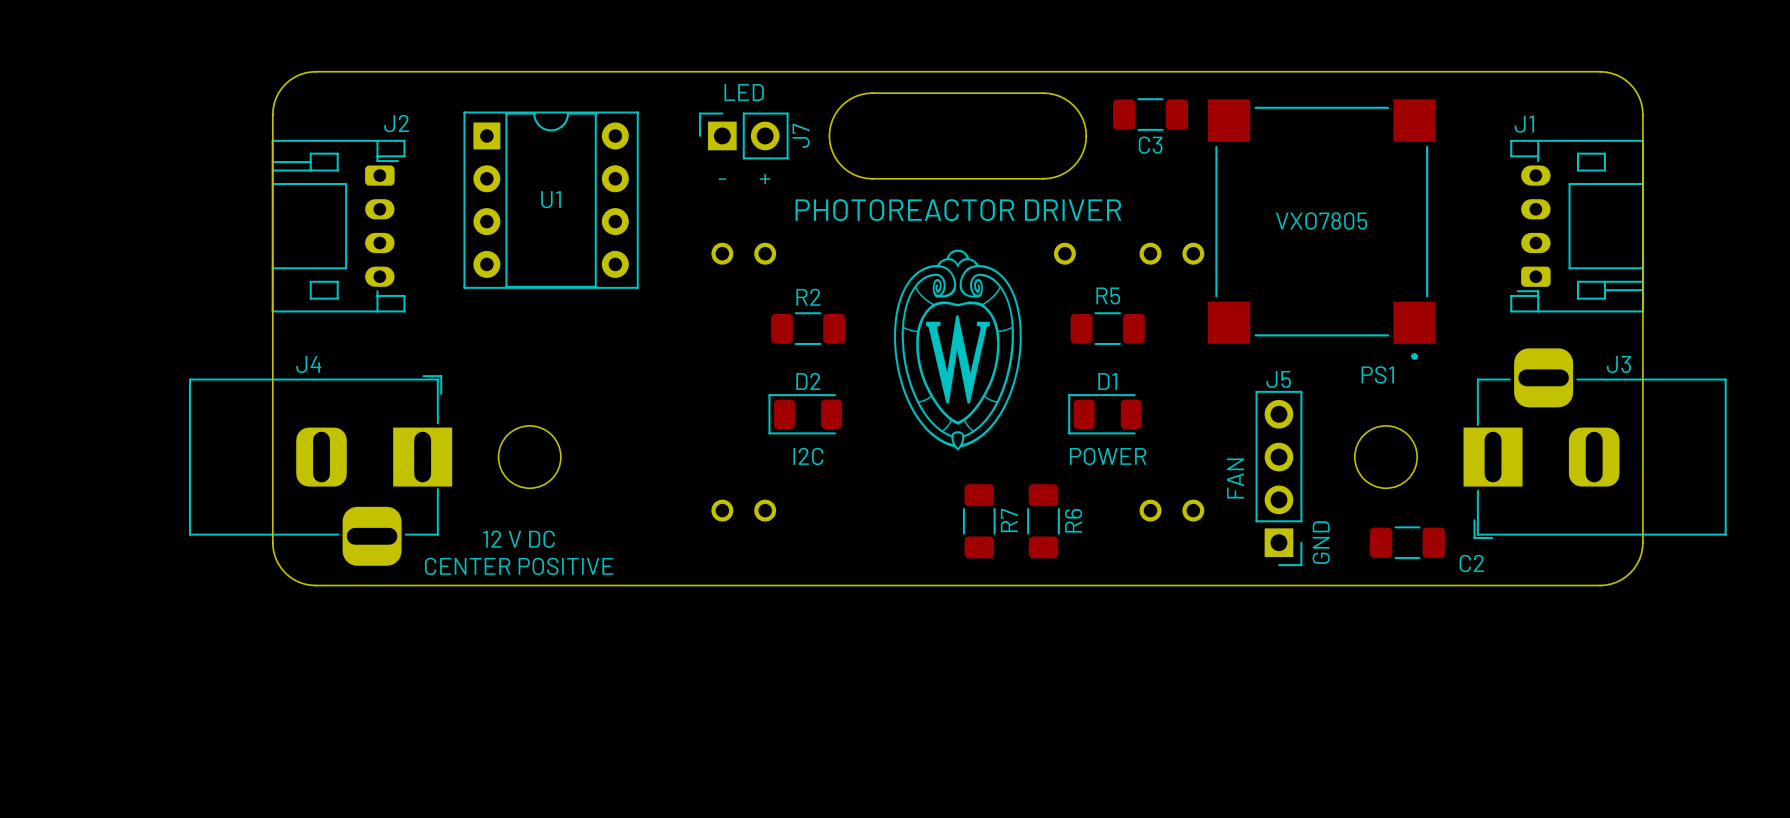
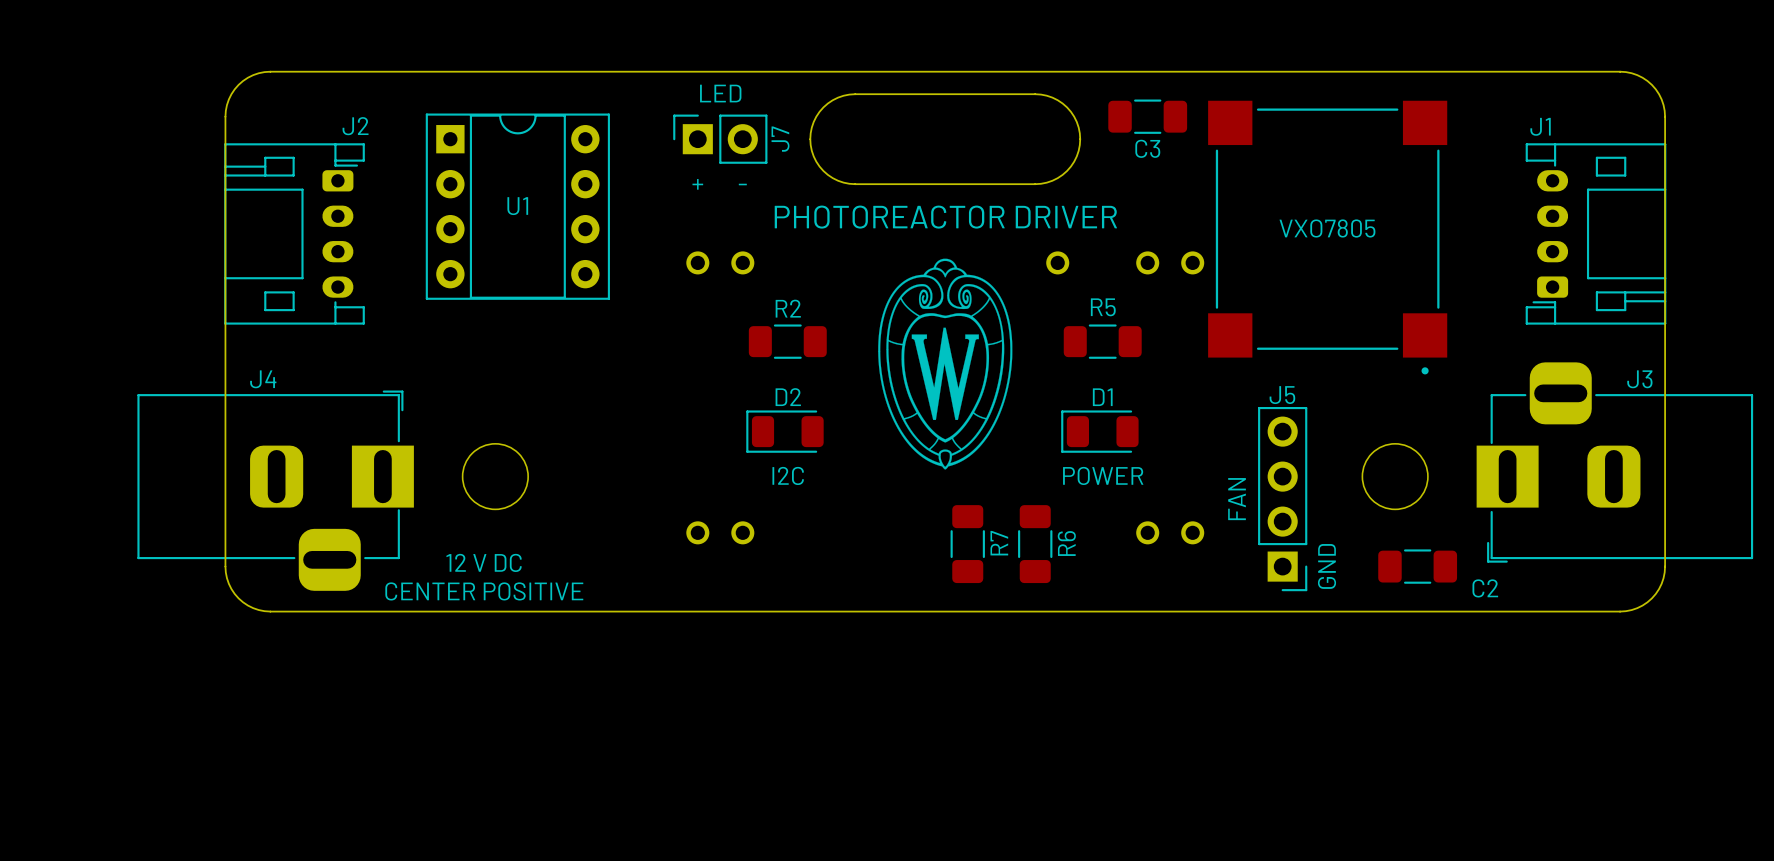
text: + (765, 178) -> - (742, 184)
text: - (722, 179) -> + (697, 184)
PS1 name: PS1 (1377, 374) -> none

